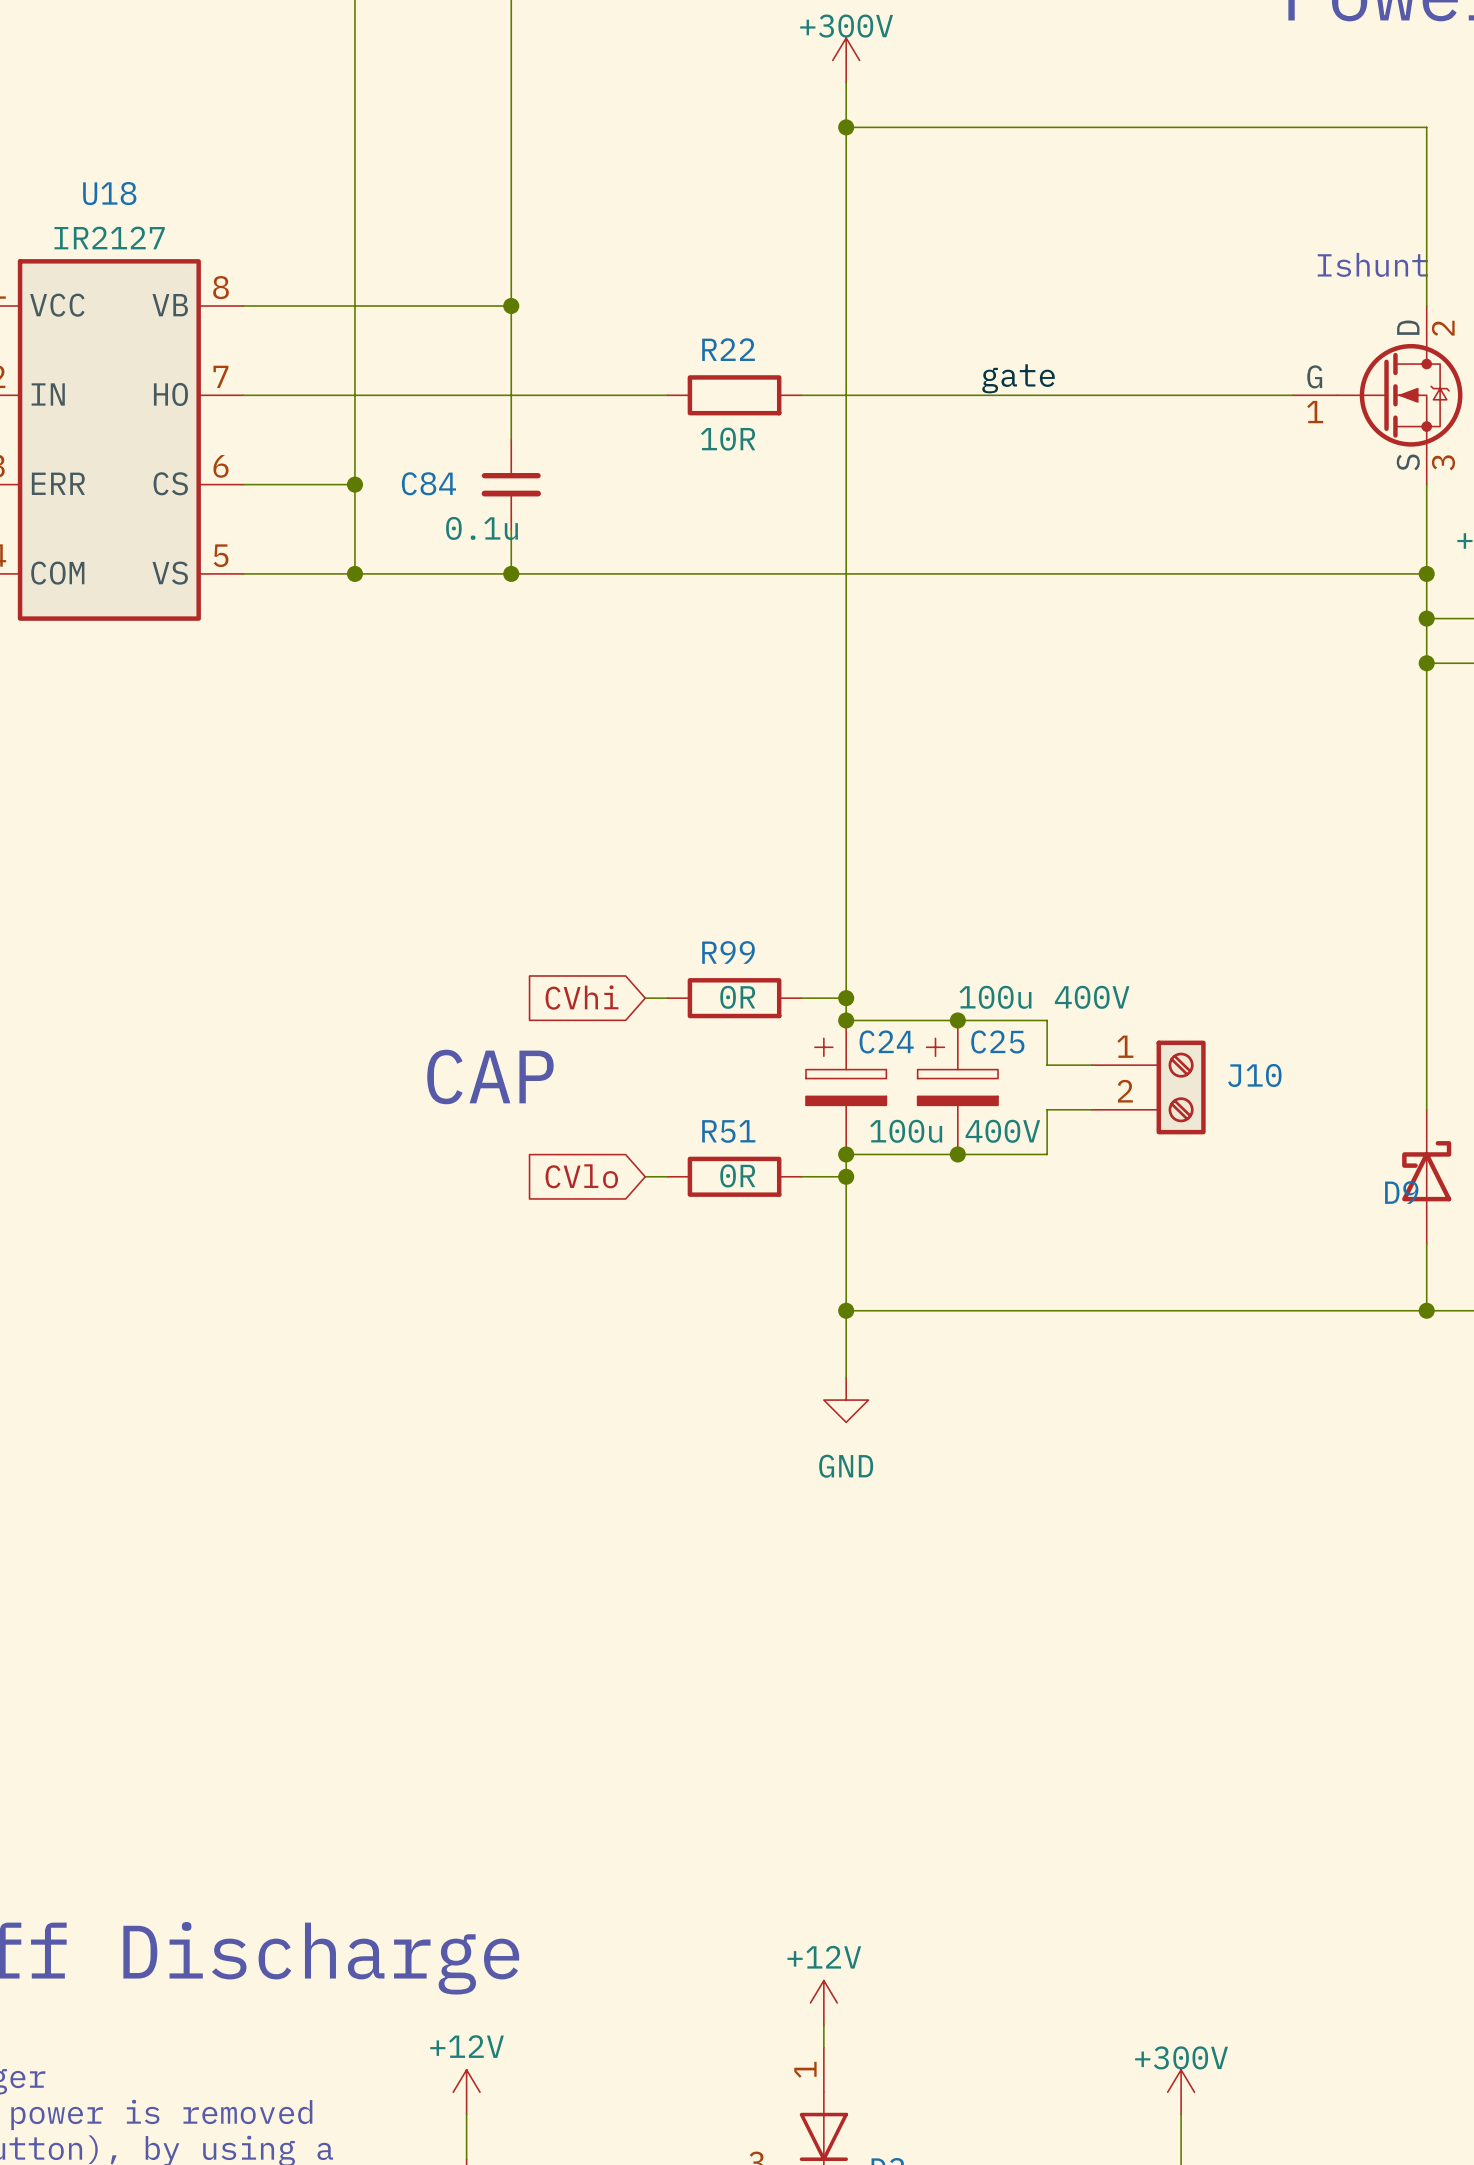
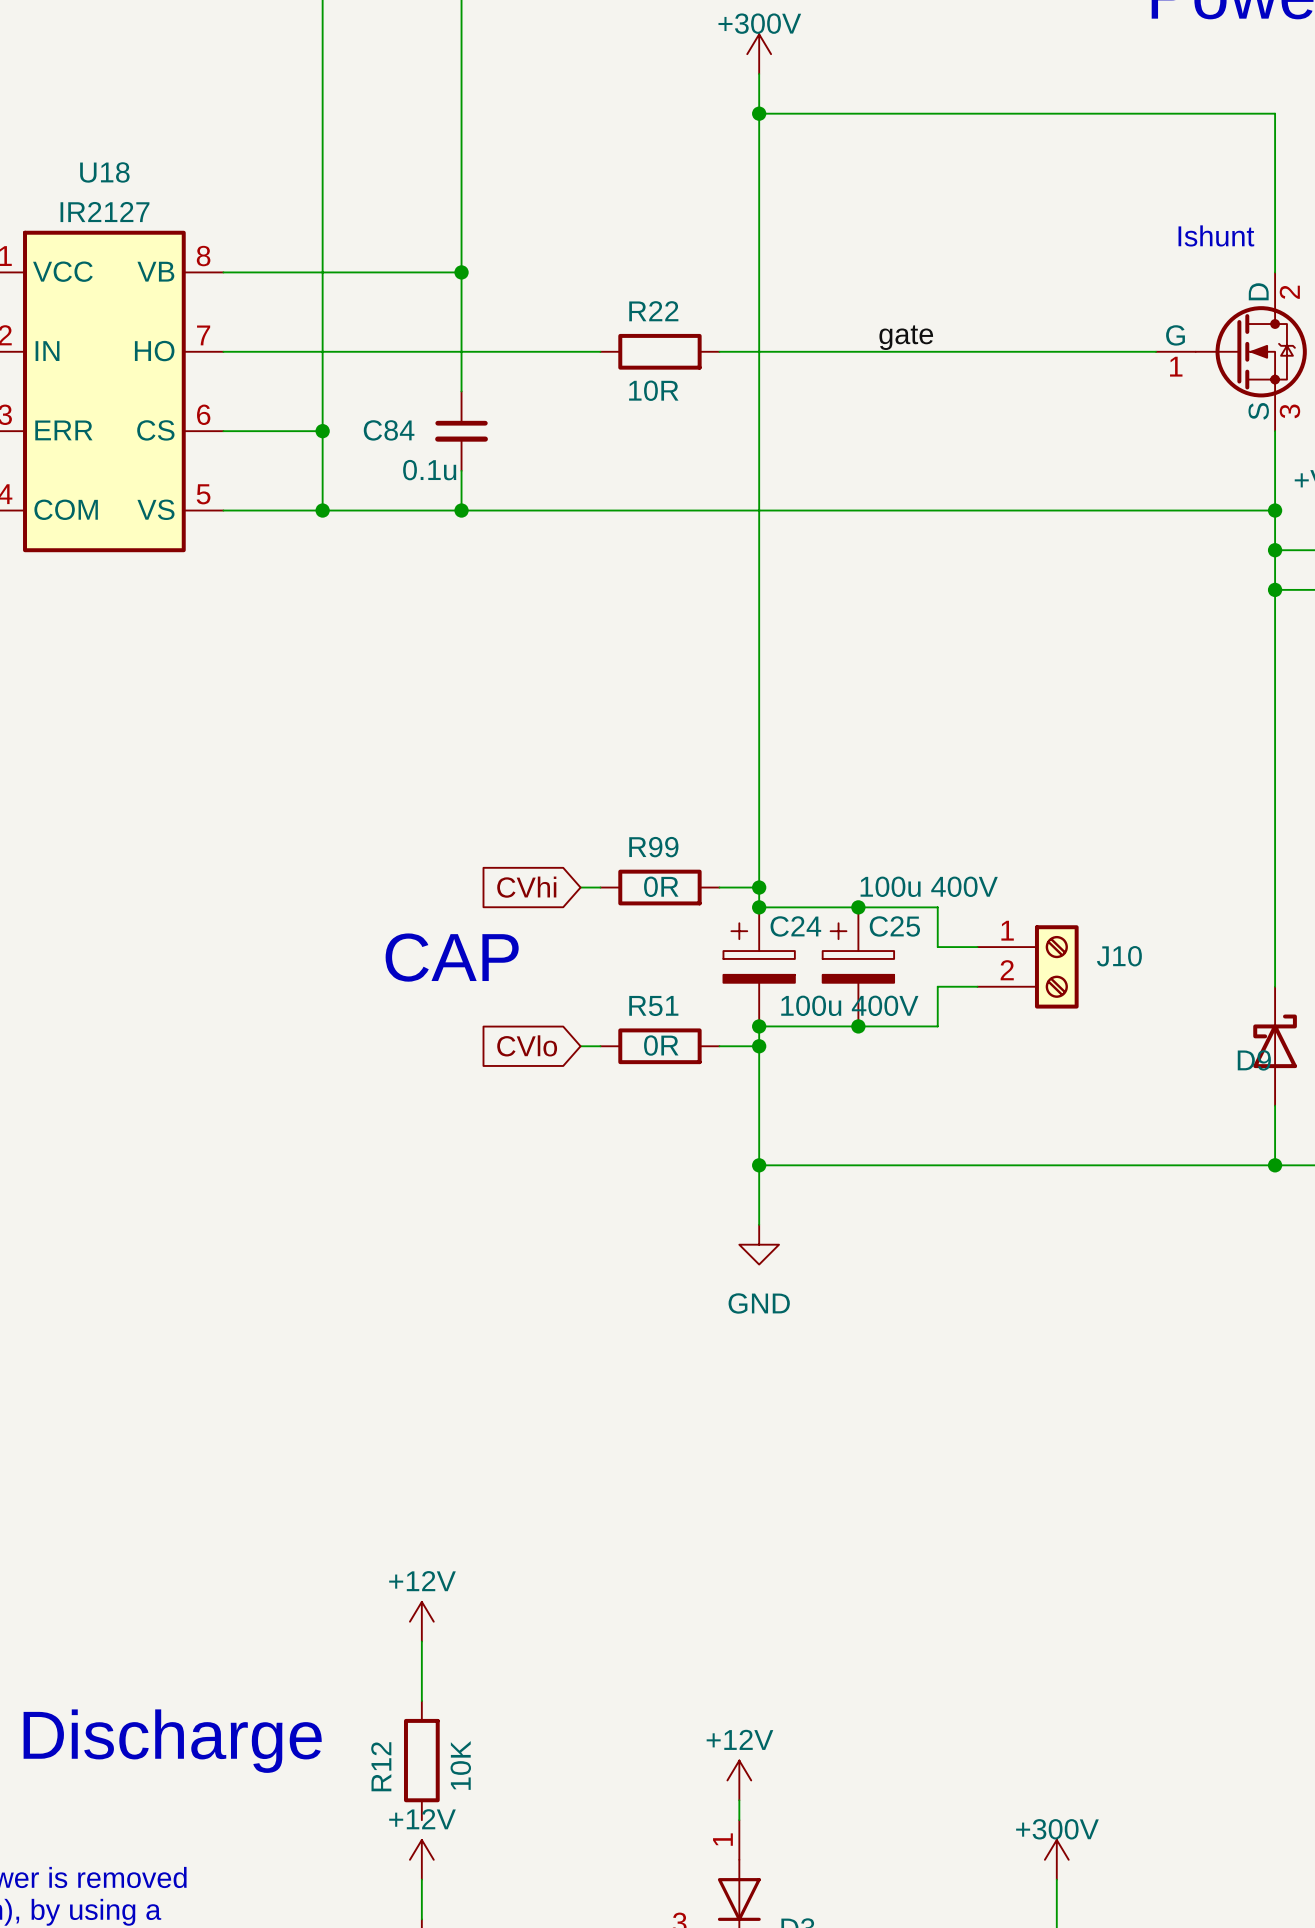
power symbol: none -> +12V (421, 1621)
wire: none -> (421, 1641) (421, 1701)
R12: none -> 10K (421, 1760)

